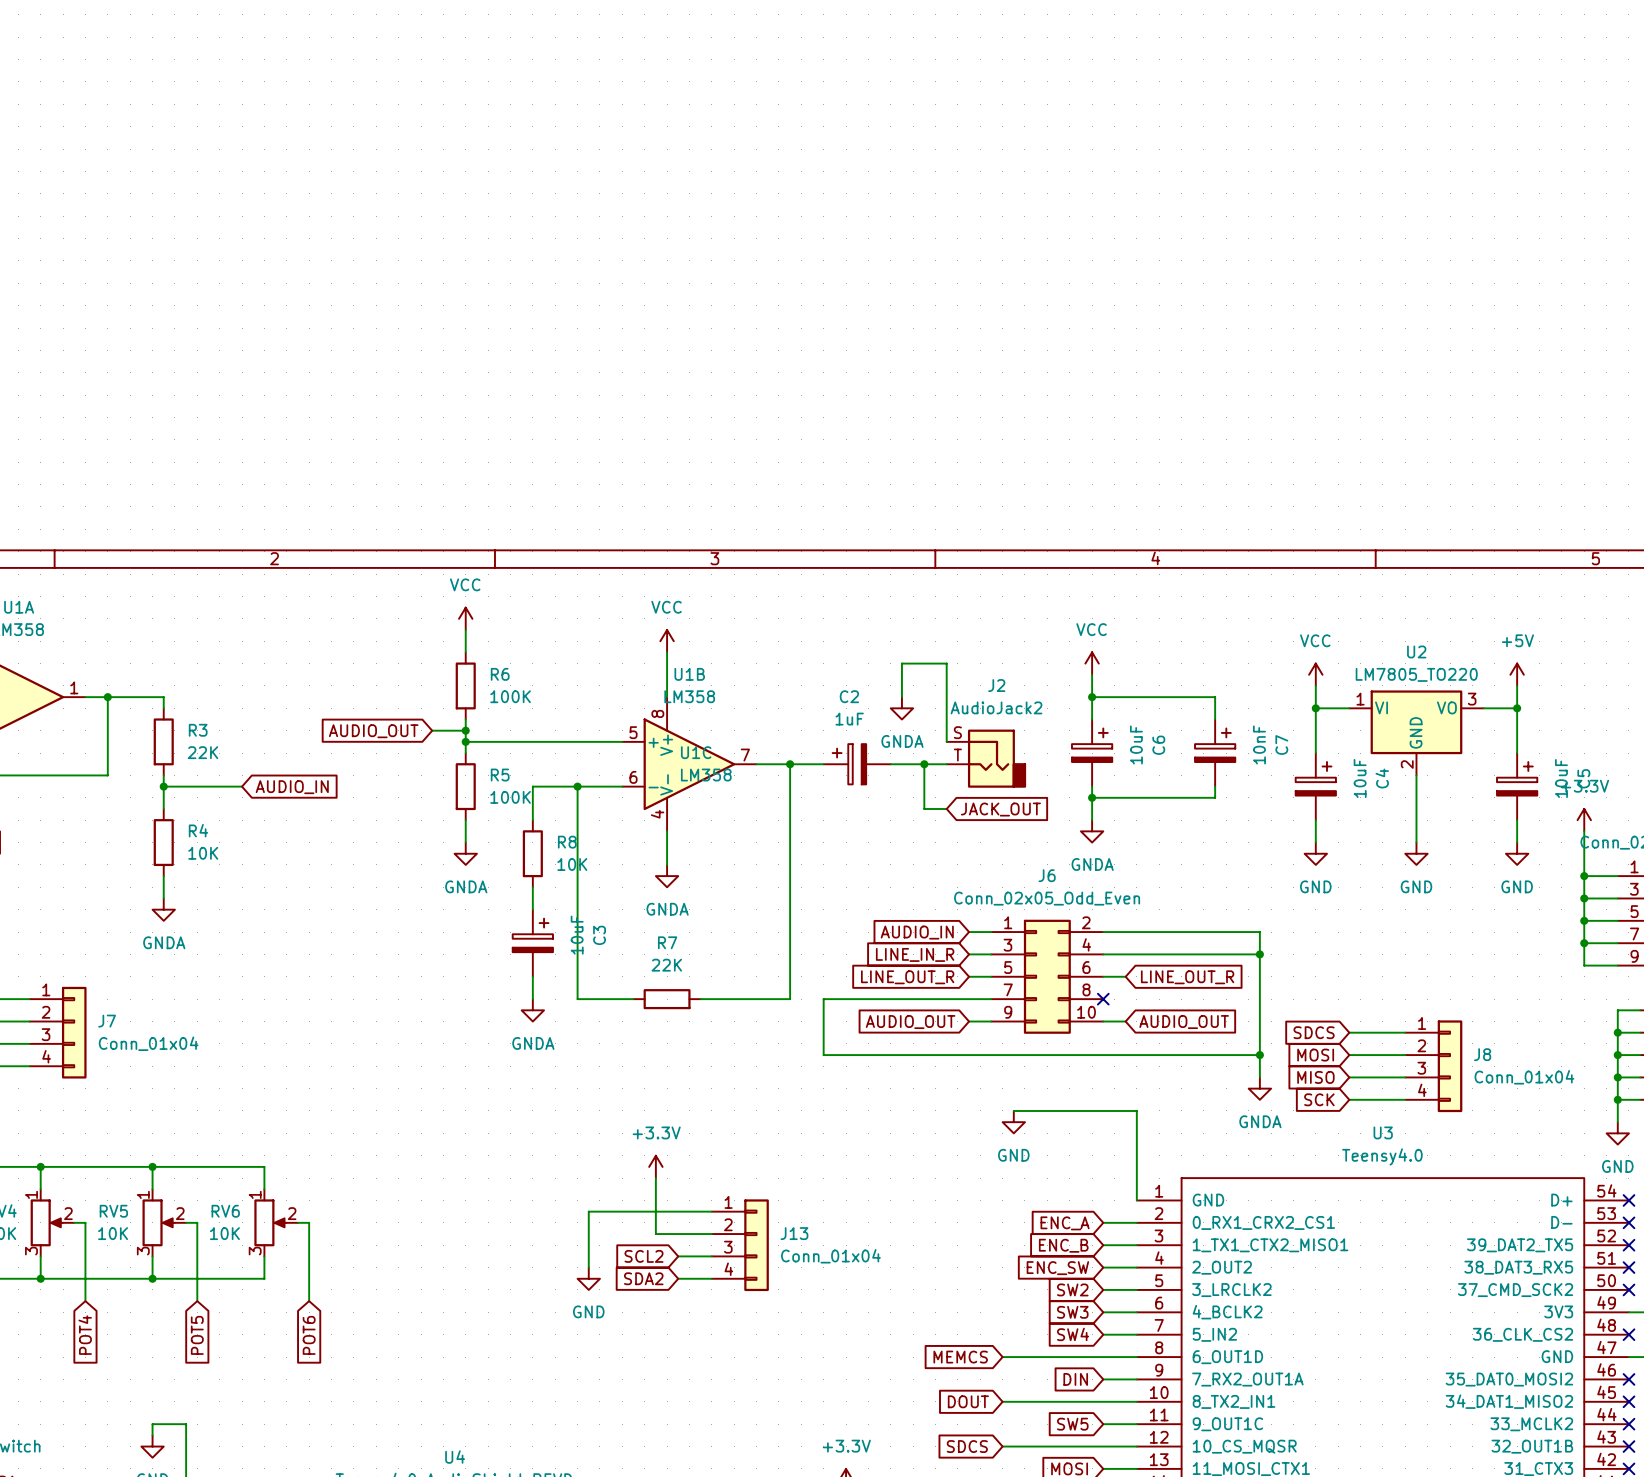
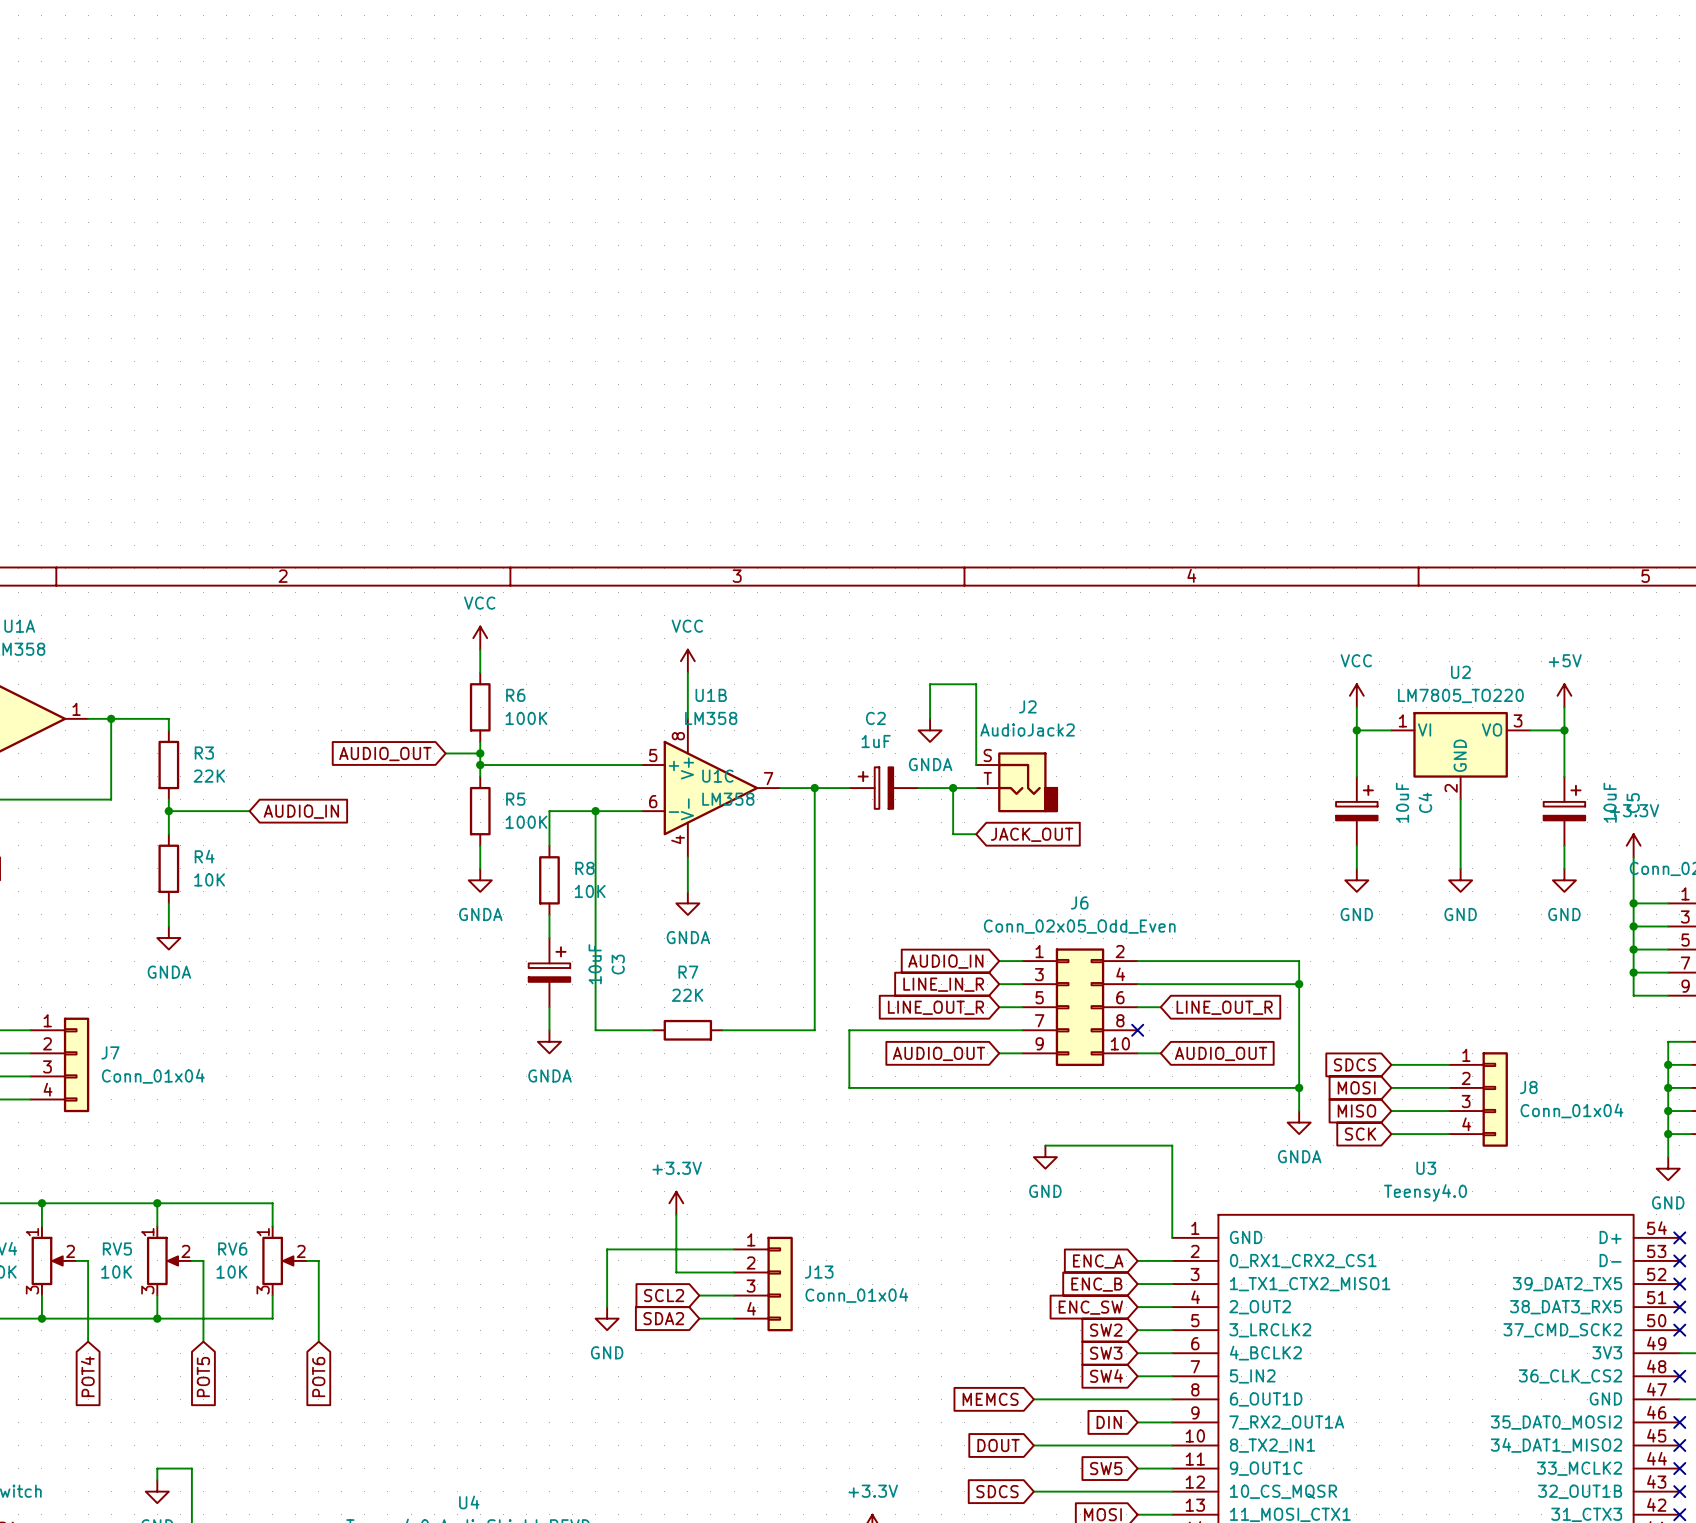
power symbol: VCC (1092, 663) -> none
wire: (1092, 674) (1092, 719) -> none
wire: (1092, 697) (1215, 697) (1215, 719) -> none
junction: (1092, 697) -> none
C6: 10uF (1092, 753) -> none
C7: 10nF (1215, 753) -> none
wire: (1092, 786) (1092, 820) -> none
wire: (1215, 786) (1215, 797) (1092, 797) -> none
junction: (1092, 797) -> none
power symbol: GNDA (1092, 831) -> none

